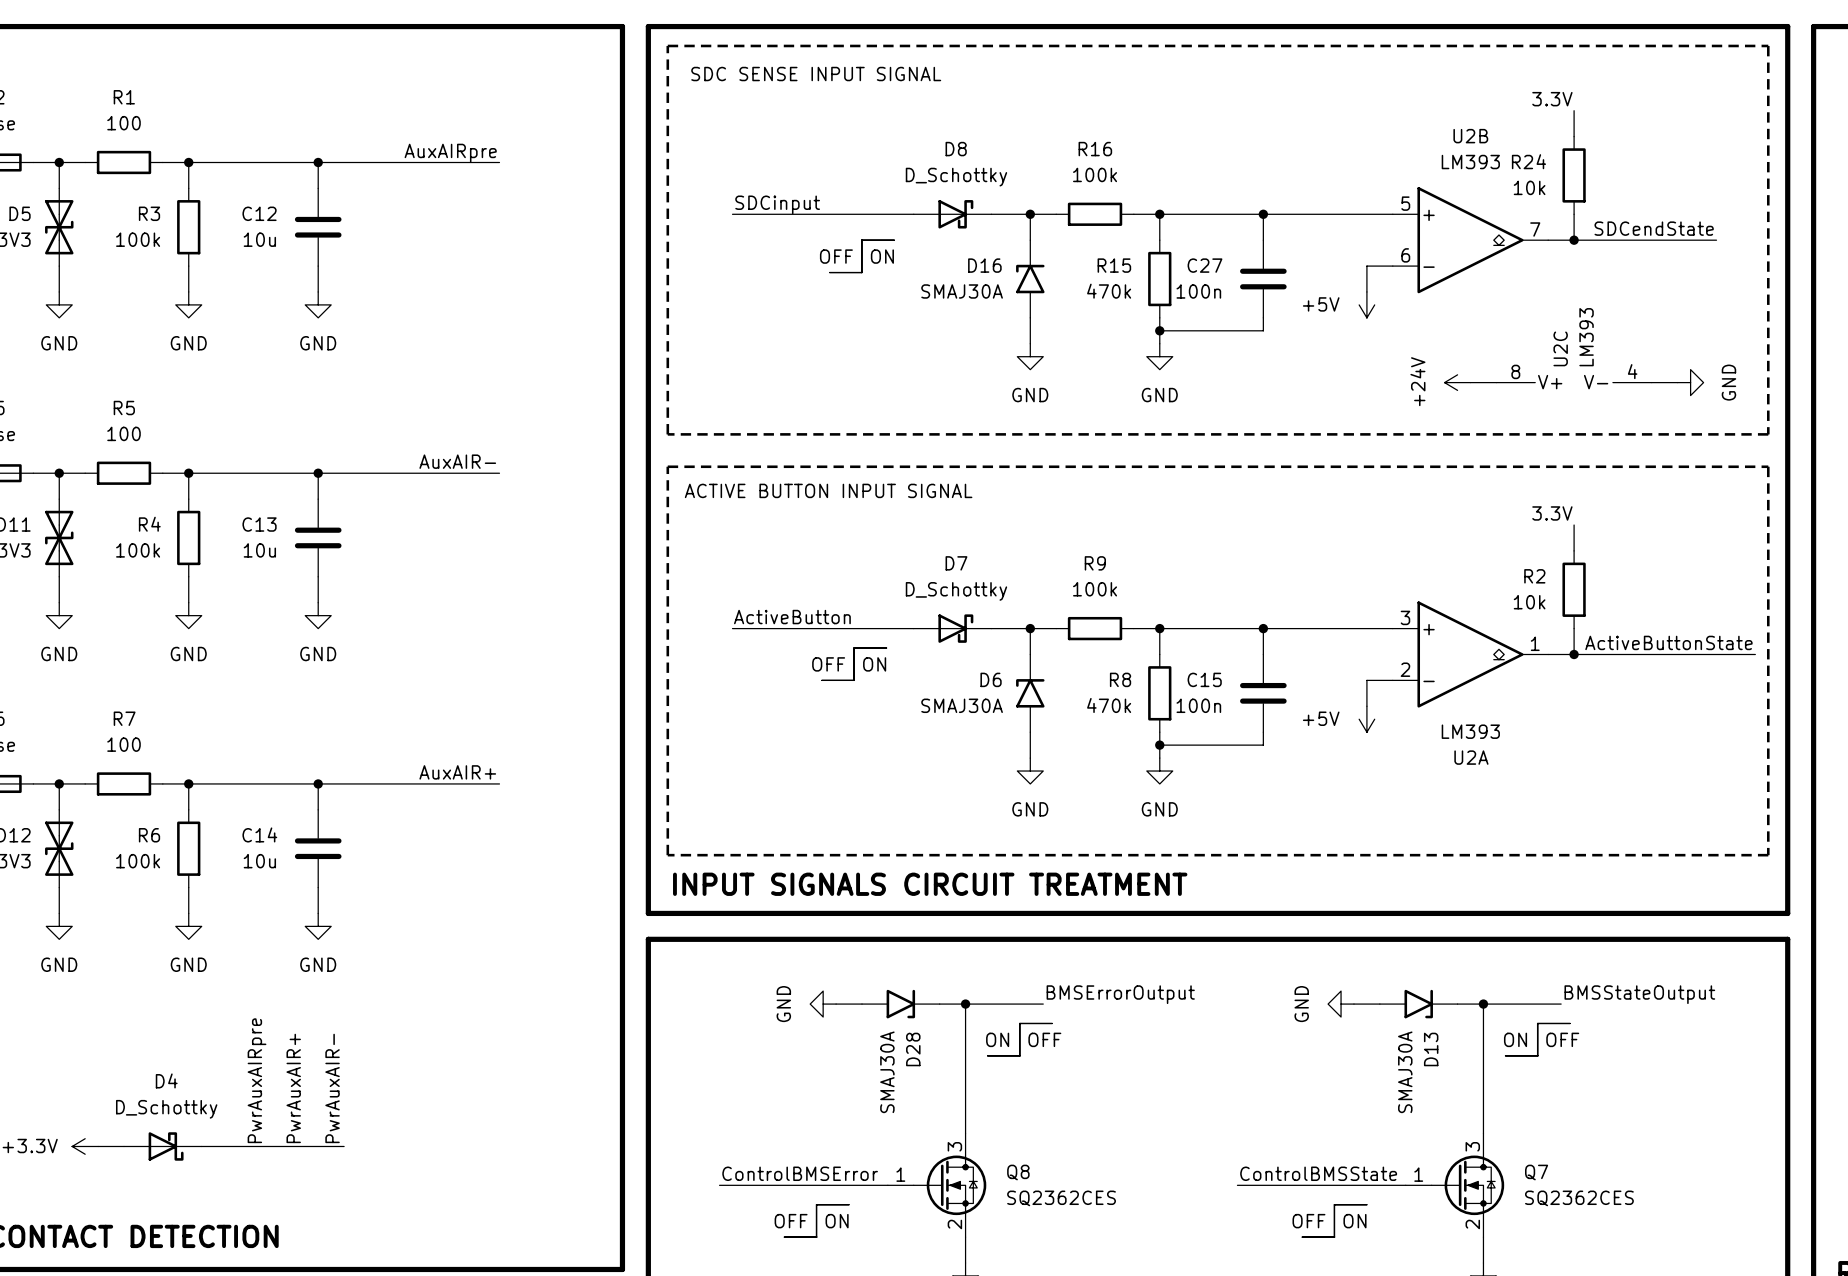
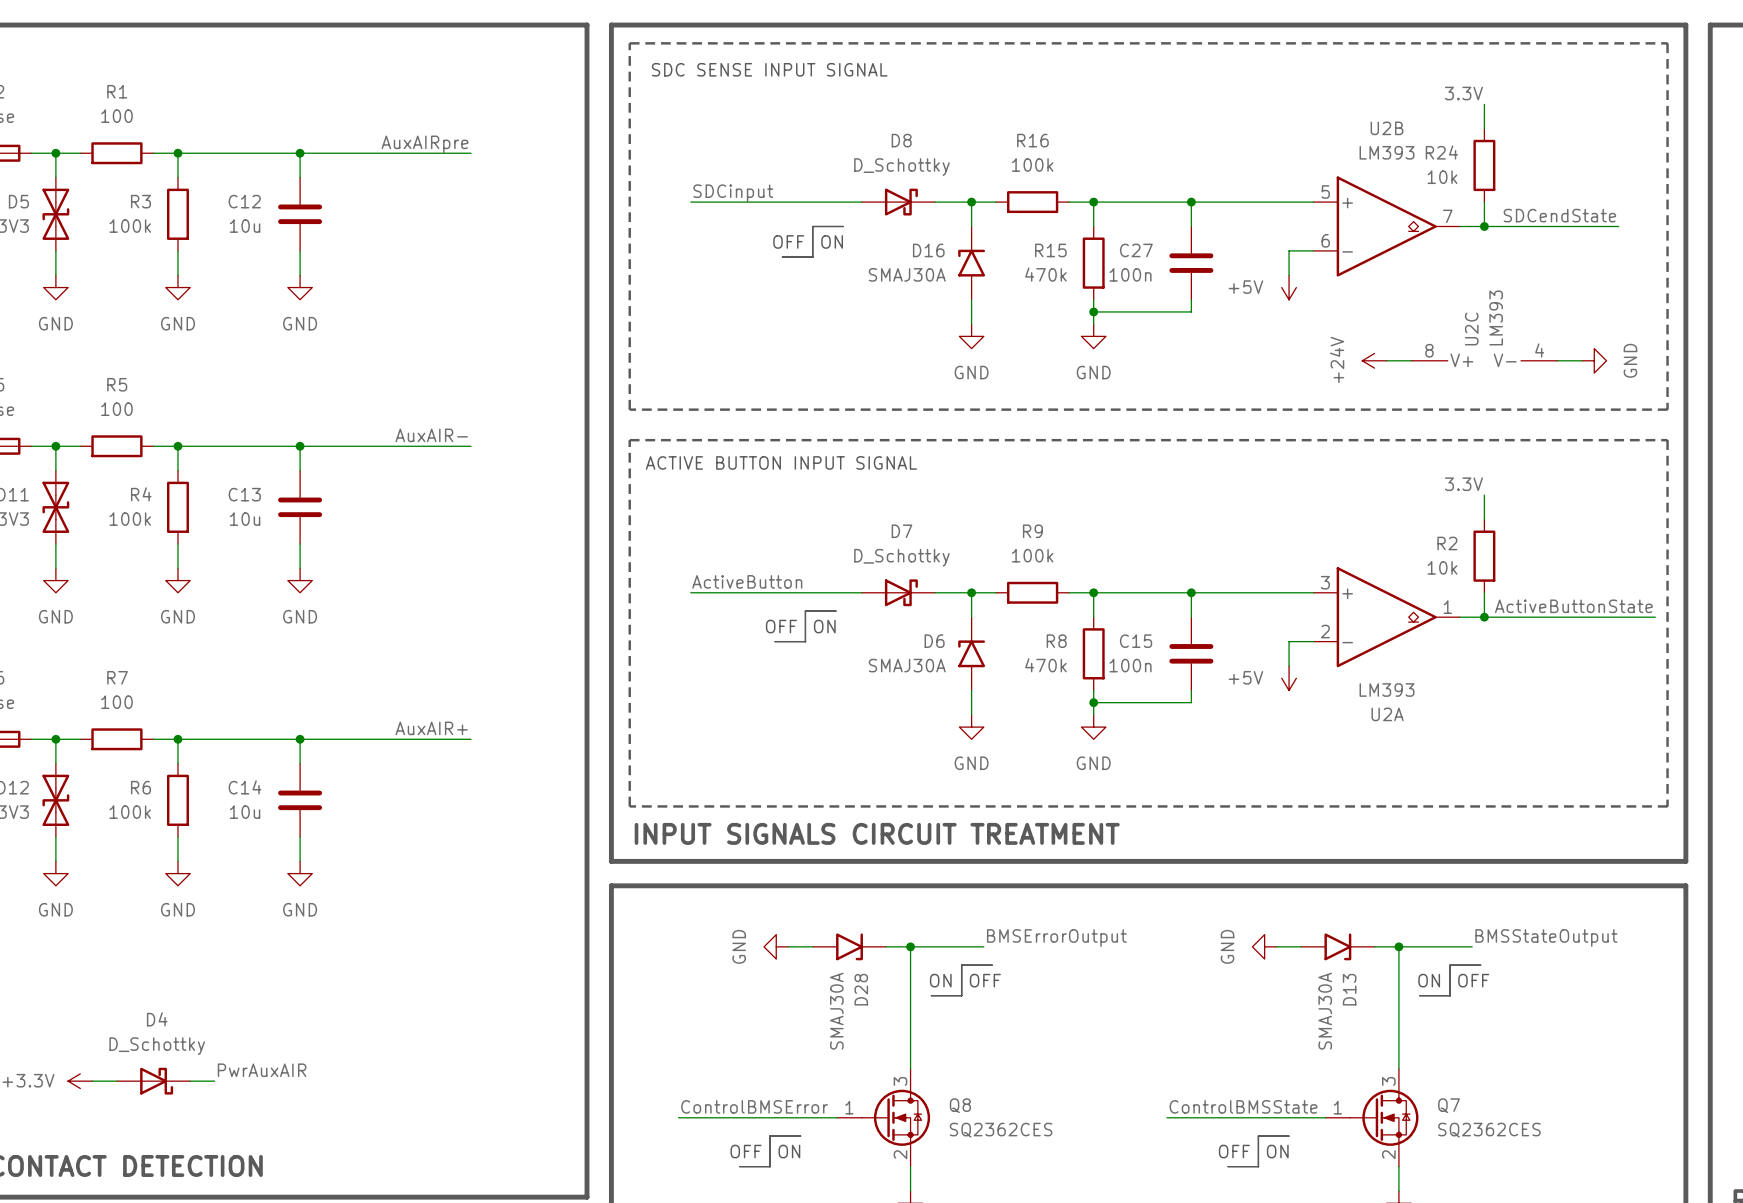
label: PwrAuxAIRpre (257, 1080) -> PwrAuxAIR (262, 1070)
label: PwrAuxAIR+ (293, 1088) -> none
label: PwrAuxAIR- (332, 1088) -> none
wire: (227, 1146) (344, 1146) -> none

